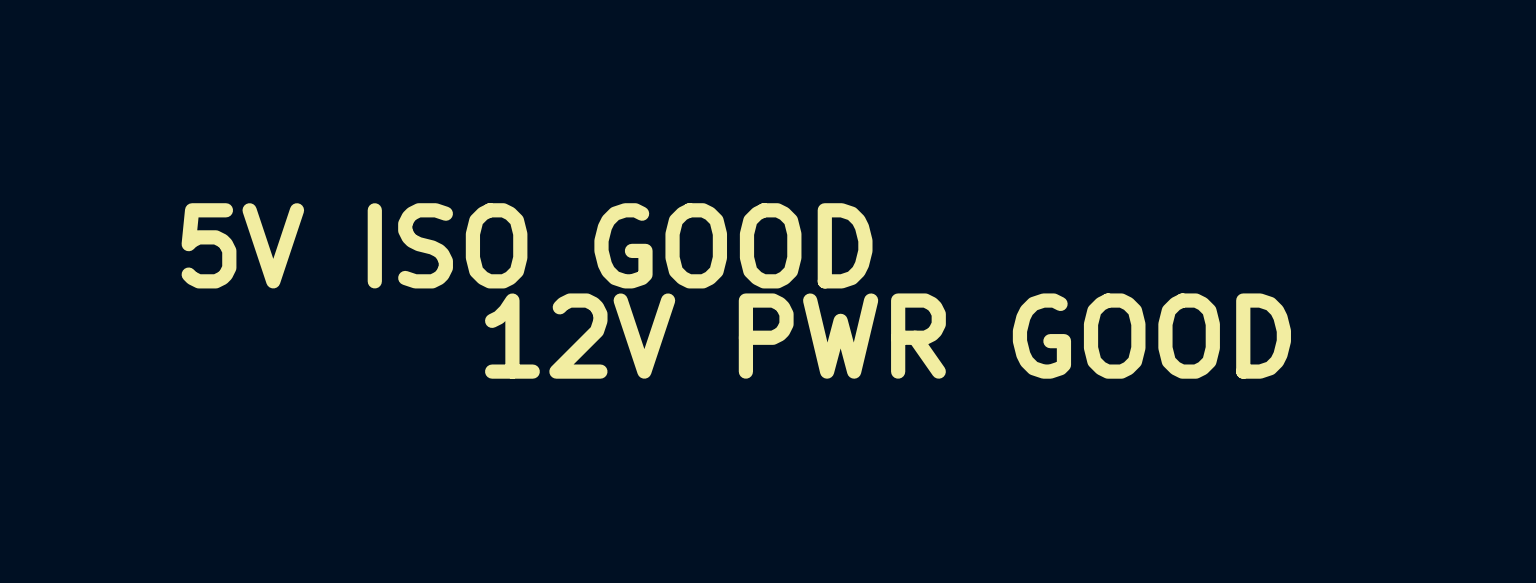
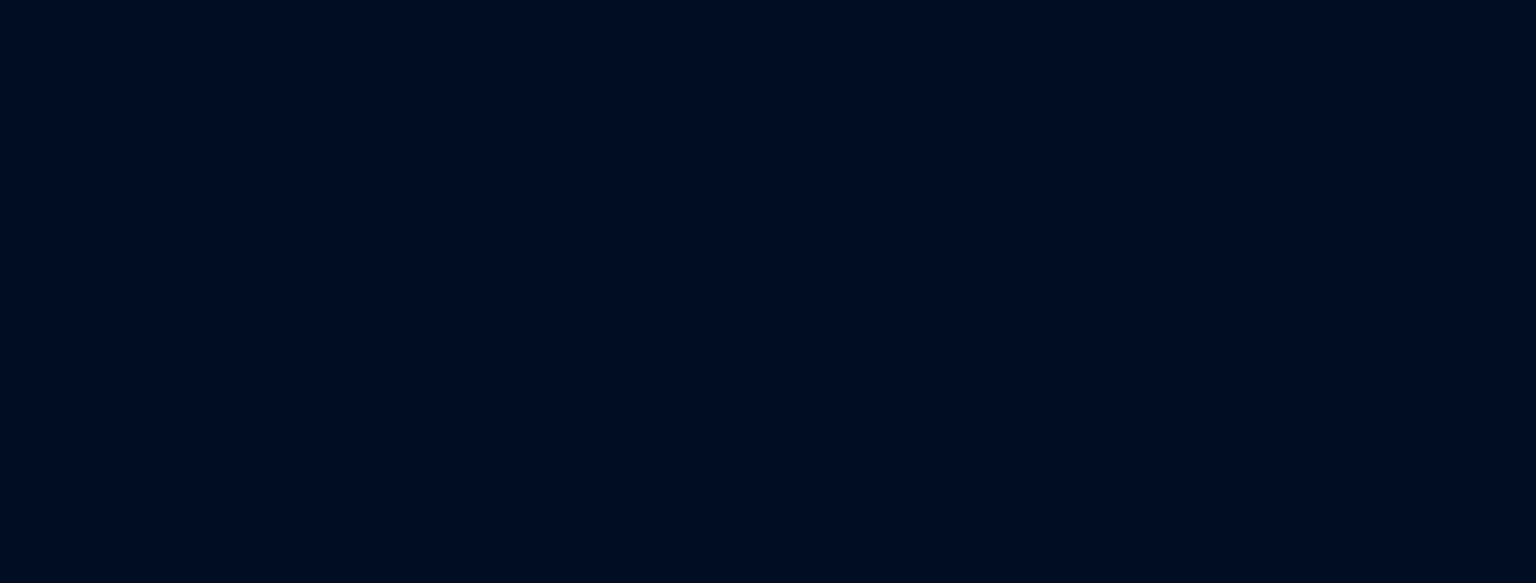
text: 5V ISO GOOD (527, 245) -> none
text: 12V PWR GOOD (888, 336) -> none

